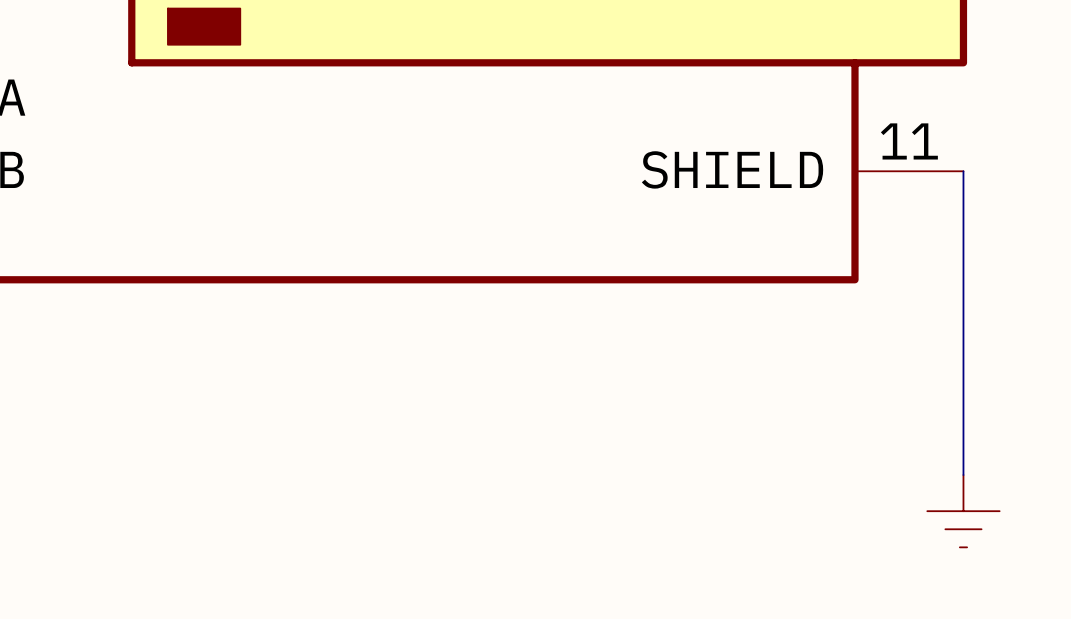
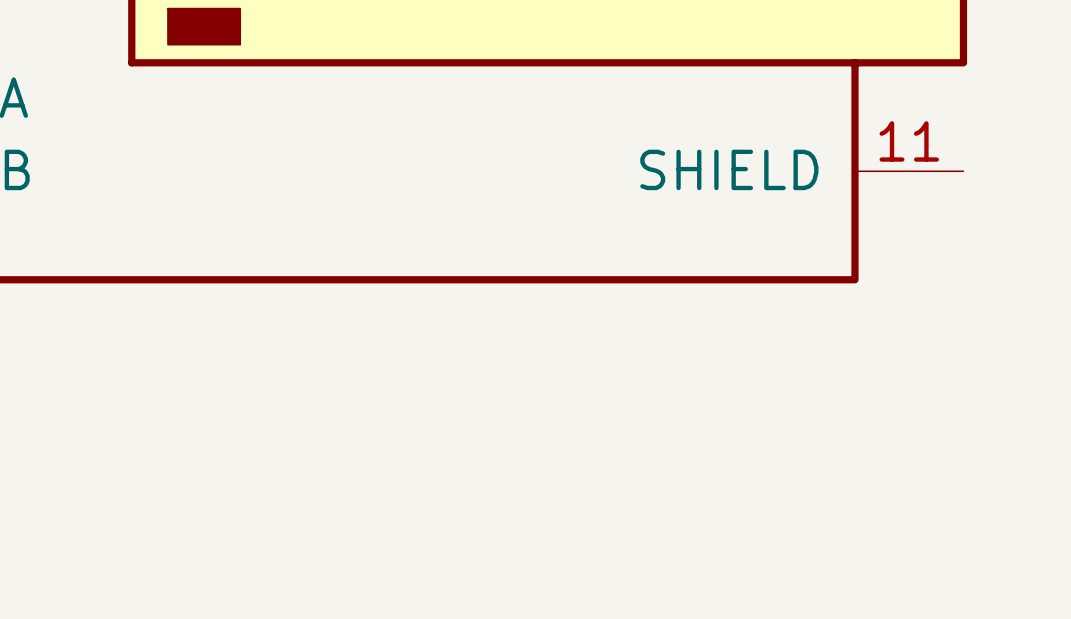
wire: (963, 171) (963, 475) -> none
power symbol: (963, 511) -> none

